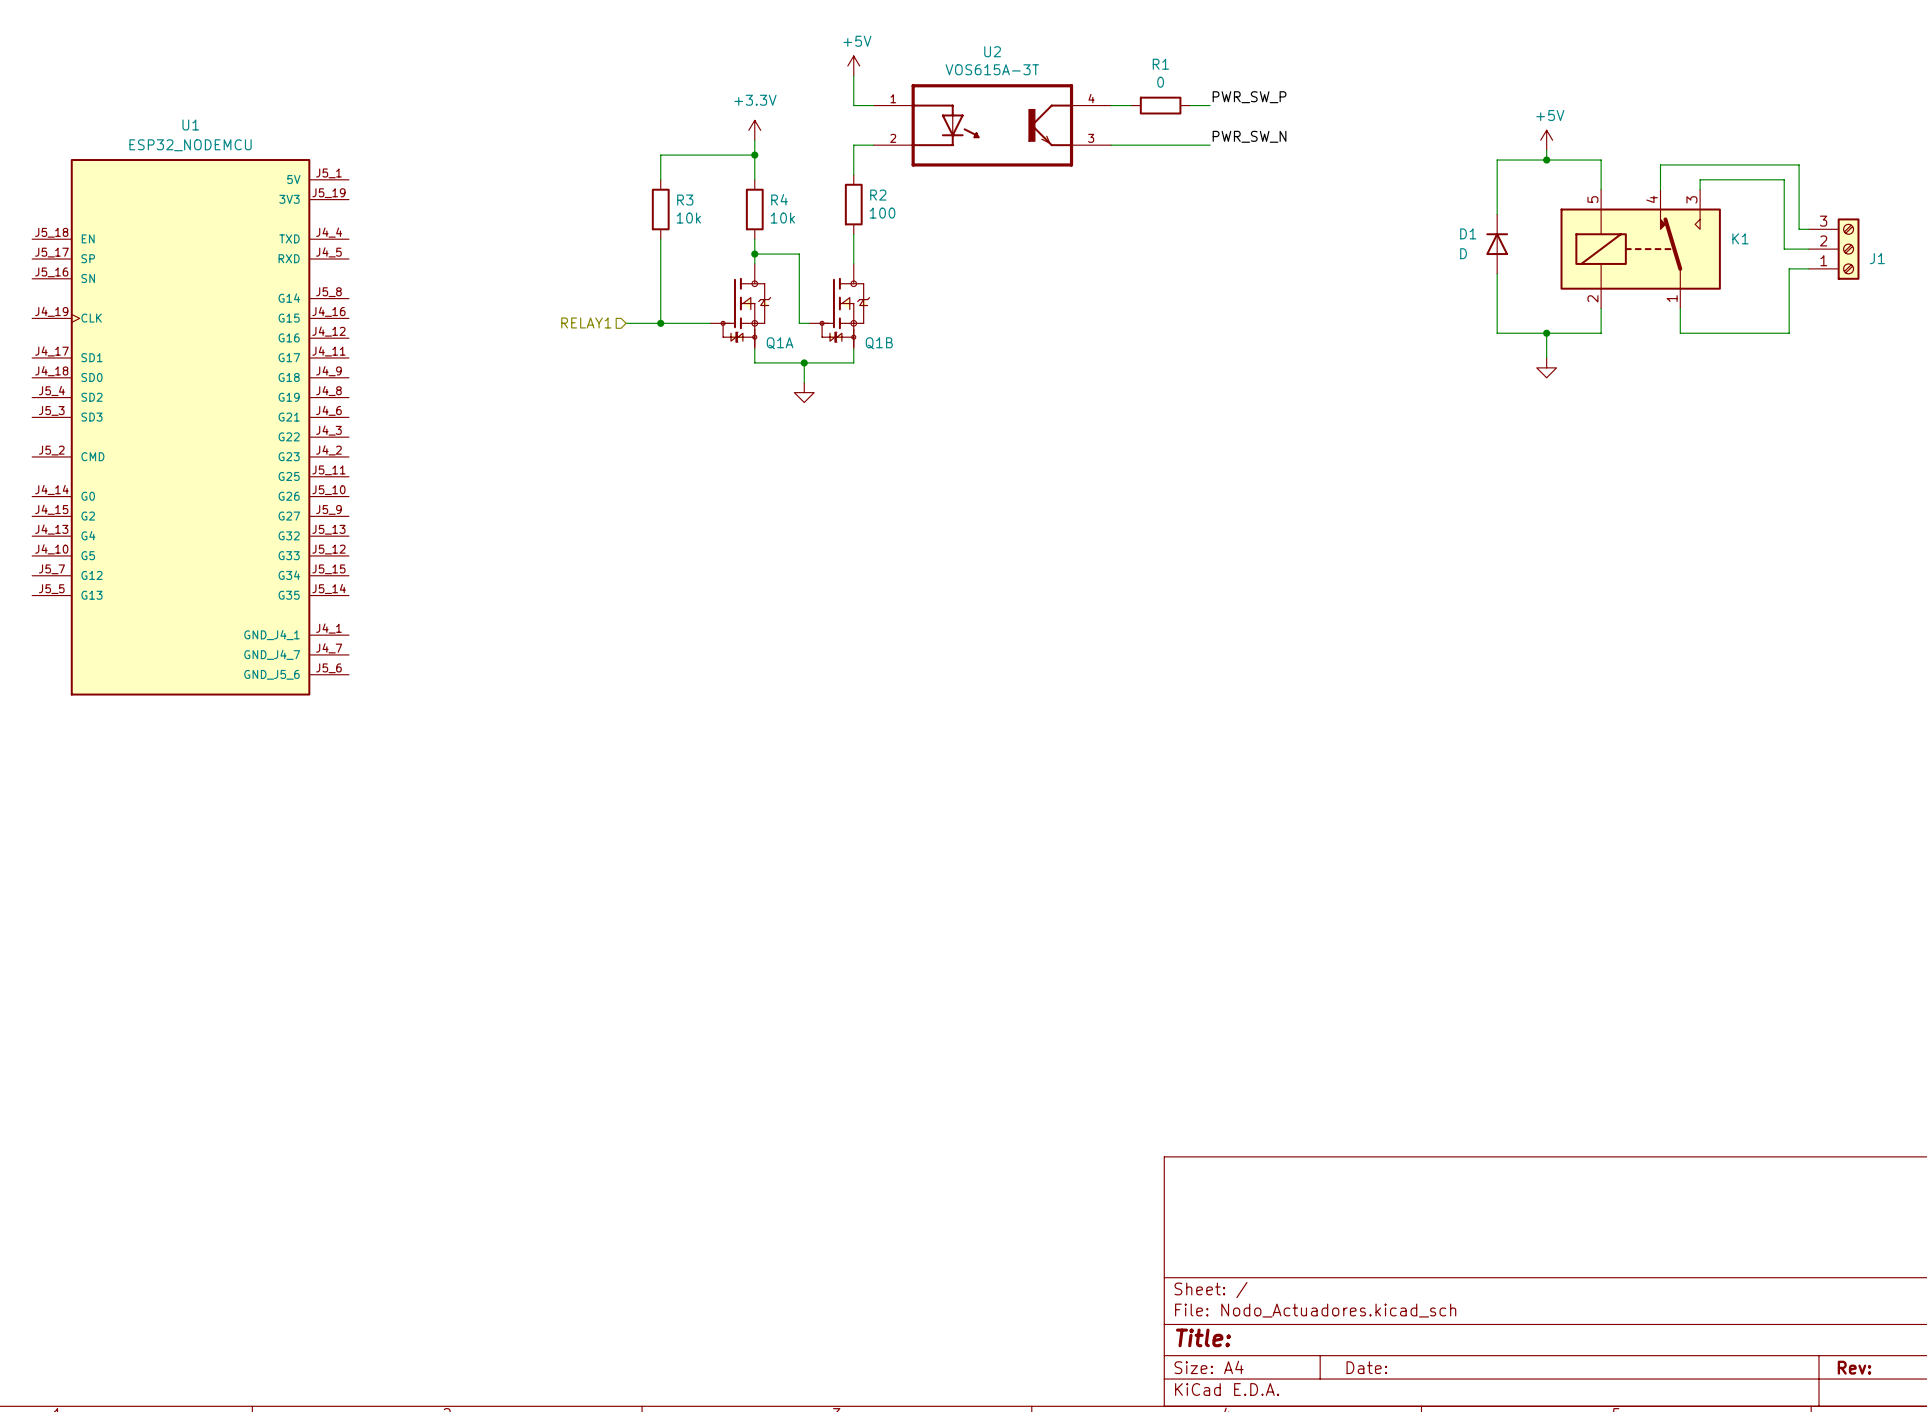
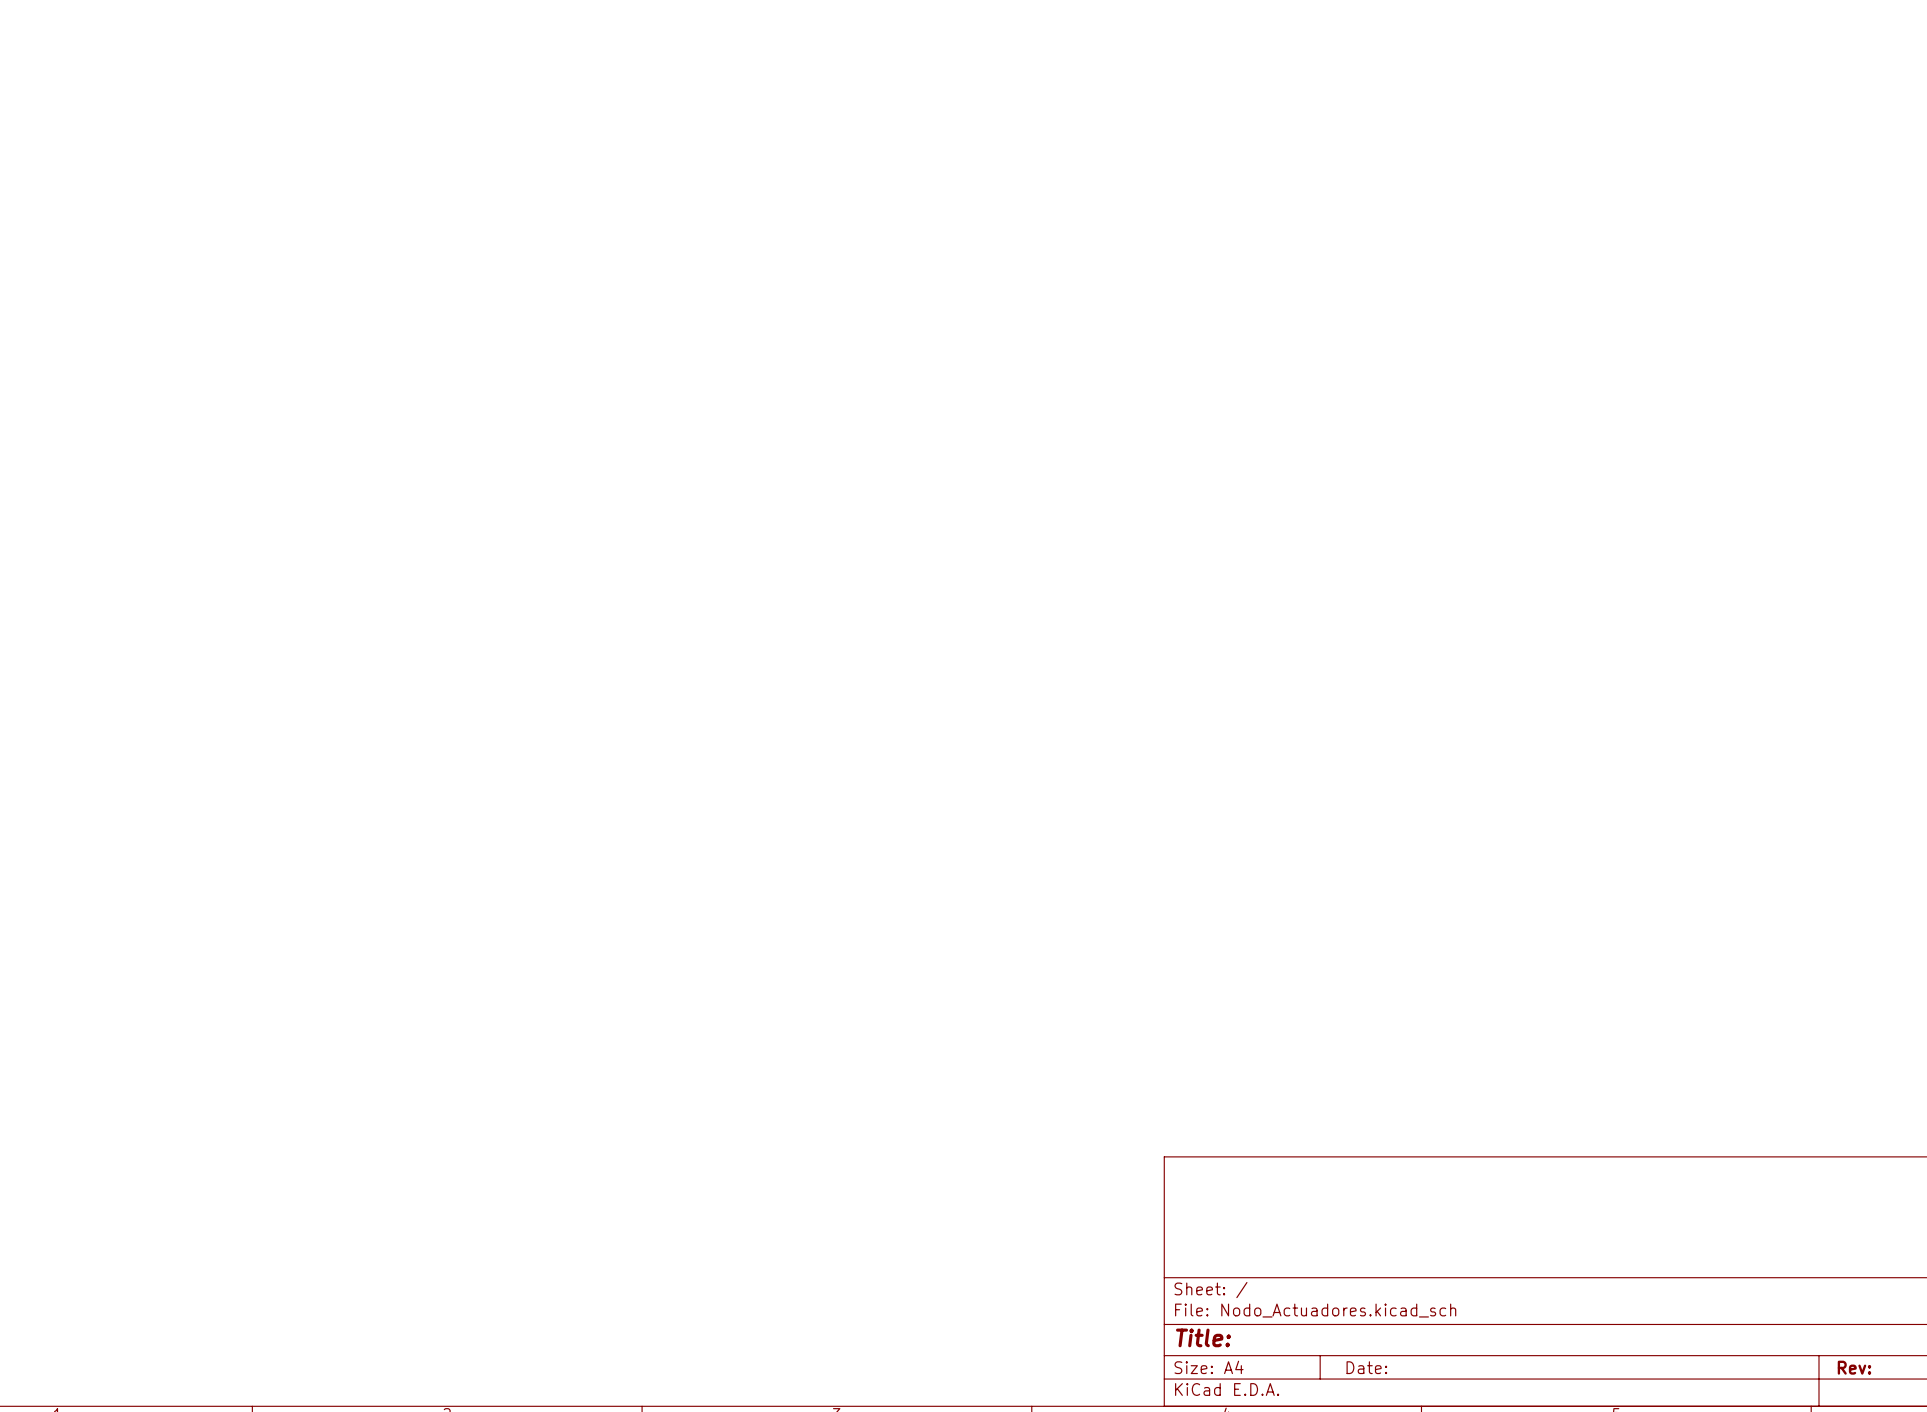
power symbol: +5V (853, 65) -> none
wire: (853, 75) (853, 105) (873, 105) -> none
label: PWR_SW_P (1249, 97) -> none
wire: (1111, 105) (1130, 105) -> none
R1: 0 (1160, 105) -> none
wire: (1190, 105) (1210, 105) -> none
U2: VOS615A-3T (992, 125) -> none
power symbol: +3.3V (754, 130) -> none
label: PWR_SW_N (1249, 136) -> none
wire: (754, 140) (754, 179) -> none
power symbol: +5V (1546, 140) -> none
wire: (873, 145) (853, 145) (853, 174) -> none
wire: (1111, 145) (1210, 145) -> none
wire: (1546, 150) (1546, 160) -> none
wire: (754, 155) (660, 155) (660, 179) -> none
junction: (754, 155) -> none
junction: (1546, 160) -> none
wire: (1601, 189) (1601, 160) (1497, 160) (1497, 214) -> none
wire: (1660, 189) (1660, 164) (1799, 164) (1799, 229) (1808, 229) -> none
wire: (1700, 189) (1700, 179) (1784, 179) (1784, 249) (1808, 249) -> none
R2: 100 (853, 204) -> none
R3: 10k (660, 209) -> none
R4: 10k (754, 209) -> none
wire: (853, 234) (853, 263) -> none
wire: (660, 239) (660, 323) -> none
wire: (754, 239) (754, 263) -> none
D1: D (1497, 244) -> none
K1: (1640, 249) -> none
J1: (1834, 249) -> none
wire: (754, 254) (799, 254) (799, 323) (809, 323) -> none
junction: (754, 254) -> none
wire: (1808, 268) (1789, 268) (1789, 333) (1680, 333) (1680, 308) -> none
wire: (1497, 273) (1497, 333) (1601, 333) (1601, 308) -> none
Q1A: (740, 306) -> none
Q1B: (839, 306) -> none
hierarchical label: RELAY1 (586, 322) -> none
wire: (626, 323) (710, 323) -> none
junction: (660, 323) -> none
wire: (1546, 333) (1546, 357) -> none
junction: (1546, 333) -> none
wire: (754, 349) (754, 362) (853, 362) (853, 349) -> none
wire: (804, 362) (804, 382) -> none
junction: (804, 362) -> none
power symbol: (1546, 367) -> none
power symbol: (804, 392) -> none
U1: ESP32_NODEMCU (190, 427) -> none

